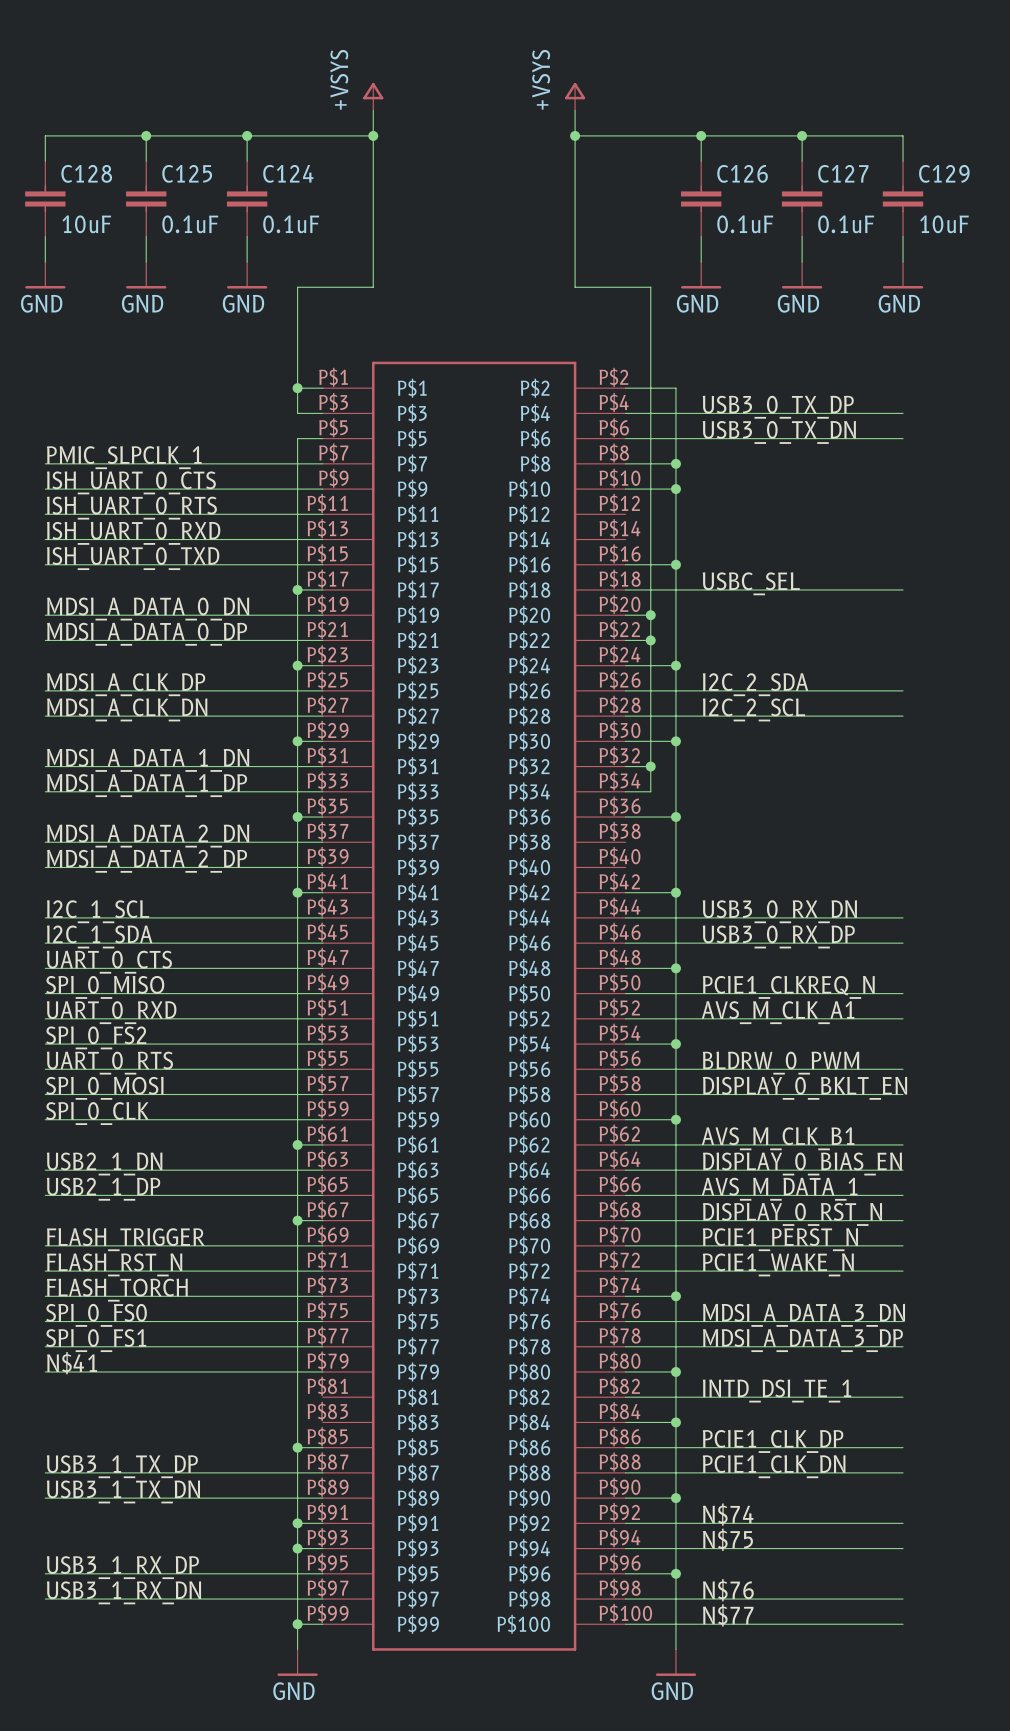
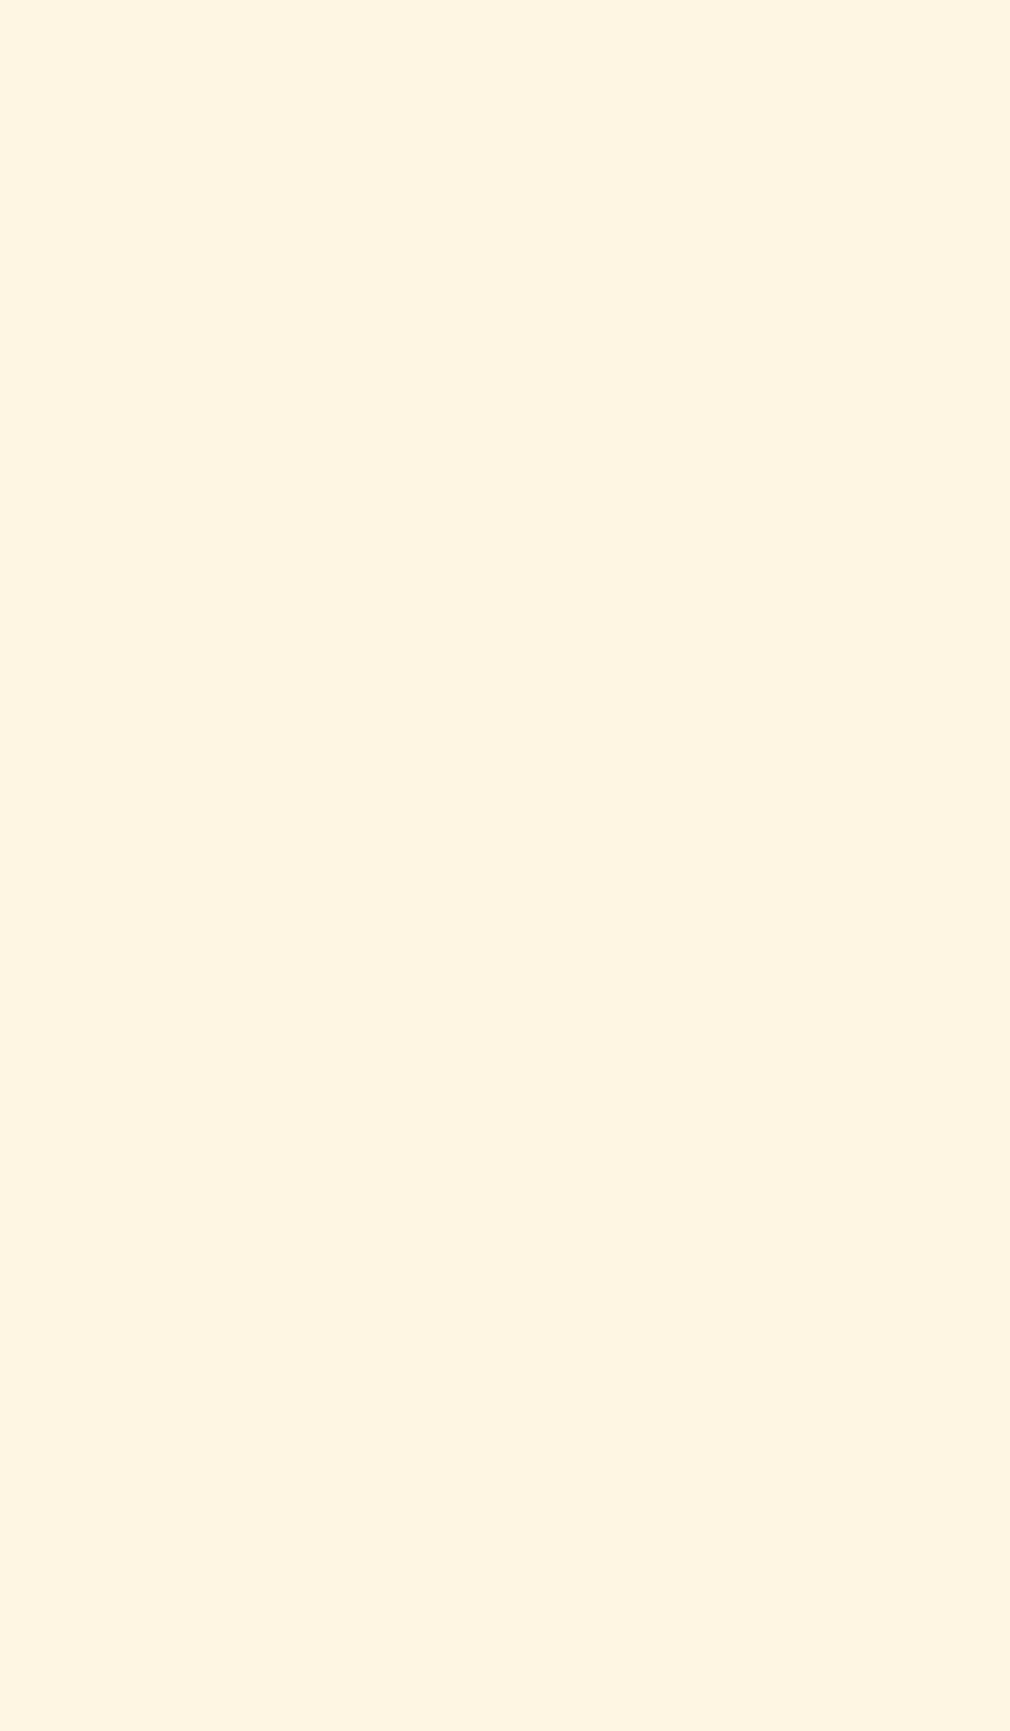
power symbol: +VSYS (373, 96) -> none
power symbol: +VSYS (575, 96) -> none
wire: (373, 110) (373, 287) (297, 287) (297, 413) (322, 413) -> none
wire: (575, 110) (575, 287) (650, 287) (650, 791) (625, 791) -> none
wire: (146, 135) (146, 161) -> none
junction: (146, 135) -> none
wire: (247, 135) (247, 161) -> none
junction: (247, 135) -> none
wire: (373, 135) (45, 135) (45, 161) -> none
junction: (373, 135) -> none
wire: (575, 135) (903, 135) (903, 161) -> none
junction: (575, 135) -> none
wire: (701, 135) (701, 161) -> none
junction: (701, 135) -> none
wire: (802, 135) (802, 161) -> none
junction: (802, 135) -> none
C128: 10uF (45, 198) -> none
C125: 0.1uF (146, 198) -> none
C124: 0.1uF (247, 198) -> none
C126: 0.1uF (701, 198) -> none
C127: 0.1uF (802, 198) -> none
C129: 10uF (903, 198) -> none
wire: (45, 236) (45, 262) -> none
wire: (146, 236) (146, 262) -> none
wire: (247, 236) (247, 262) -> none
wire: (701, 236) (701, 262) -> none
wire: (802, 236) (802, 262) -> none
wire: (903, 236) (903, 262) -> none
power symbol: GND (45, 275) -> none
power symbol: GND (146, 275) -> none
power symbol: GND (247, 275) -> none
power symbol: GND (701, 275) -> none
power symbol: GND (802, 275) -> none
power symbol: GND (903, 275) -> none
wire: (297, 388) (322, 388) -> none
junction: (297, 388) -> none
wire: (625, 388) (675, 388) (675, 1649) -> none
label: USB3_0_TX_DP (778, 407) -> none
wire: (625, 413) (903, 413) -> none
label: USB3_0_TX_DN (779, 432) -> none
wire: (322, 438) (297, 438) (297, 1649) -> none
wire: (625, 438) (903, 438) -> none
label: PMIC_SLPCLK_1 (124, 457) -> none
wire: (45, 463) (322, 463) -> none
wire: (625, 463) (675, 463) -> none
junction: (675, 463) -> none
label: ISH_UART_0_CTS (131, 482) -> none
wire: (45, 489) (322, 489) -> none
wire: (625, 489) (675, 489) -> none
junction: (675, 489) -> none
label: ISH_UART_0_RTS (131, 508) -> none
wire: (45, 514) (322, 514) -> none
label: ISH_UART_0_RXD (133, 533) -> none
wire: (45, 539) (322, 539) -> none
label: ISH_UART_0_TXD (133, 558) -> none
wire: (45, 564) (322, 564) -> none
wire: (625, 564) (675, 564) -> none
junction: (675, 564) -> none
label: USBC_SEL (751, 583) -> none
wire: (297, 589) (322, 589) -> none
junction: (297, 589) -> none
wire: (625, 589) (903, 589) -> none
label: MDSI_A_DATA_0_DN (148, 609) -> none
wire: (45, 615) (322, 615) -> none
wire: (625, 615) (650, 615) -> none
junction: (650, 615) -> none
label: MDSI_A_DATA_0_DP (147, 634) -> none
wire: (45, 640) (322, 640) -> none
wire: (625, 640) (650, 640) -> none
junction: (650, 640) -> none
wire: (297, 665) (322, 665) -> none
junction: (297, 665) -> none
wire: (625, 665) (675, 665) -> none
junction: (675, 665) -> none
label: MDSI_A_CLK_DP (126, 684) -> none
label: I2C_2_SDA (755, 684) -> none
wire: (45, 690) (322, 690) -> none
wire: (625, 690) (903, 690) -> none
label: MDSI_A_CLK_DN (127, 709) -> none
label: I2C_2_SCL (754, 709) -> none
wire: (45, 716) (322, 716) -> none
wire: (625, 716) (903, 716) -> none
wire: (297, 741) (322, 741) -> none
junction: (297, 741) -> none
wire: (625, 741) (675, 741) -> none
junction: (675, 741) -> none
label: MDSI_A_DATA_1_DN (148, 760) -> none
wire: (45, 766) (322, 766) -> none
wire: (625, 766) (650, 766) -> none
junction: (650, 766) -> none
label: MDSI_A_DATA_1_DP (147, 785) -> none
wire: (45, 791) (322, 791) -> none
wire: (297, 817) (322, 817) -> none
junction: (297, 817) -> none
wire: (625, 817) (675, 817) -> none
junction: (675, 817) -> none
label: MDSI_A_DATA_2_DN (148, 836) -> none
wire: (45, 842) (322, 842) -> none
label: MDSI_A_DATA_2_DP (147, 861) -> none
wire: (45, 867) (322, 867) -> none
wire: (297, 892) (322, 892) -> none
junction: (297, 892) -> none
wire: (625, 892) (675, 892) -> none
junction: (675, 892) -> none
label: I2C_1_SCL (98, 911) -> none
label: USB3_0_RX_DN (779, 911) -> none
wire: (45, 917) (322, 917) -> none
wire: (625, 917) (903, 917) -> none
label: I2C_1_SDA (99, 936) -> none
label: USB3_0_RX_DP (778, 936) -> none
wire: (45, 943) (322, 943) -> none
wire: (625, 943) (903, 943) -> none
label: UART_0_CTS (109, 962) -> none
wire: (45, 968) (322, 968) -> none
wire: (625, 968) (675, 968) -> none
junction: (675, 968) -> none
label: SPI_0_MISO (105, 987) -> none
label: PCIE1_CLKREQ_N (788, 987) -> none
wire: (45, 993) (322, 993) -> none
wire: (625, 993) (903, 993) -> none
part: (474, 1006) -> none
label: UART_0_RXD (111, 1012) -> none
label: AVS_M_CLK_A1 (778, 1012) -> none
wire: (45, 1018) (322, 1018) -> none
wire: (625, 1018) (903, 1018) -> none
label: SPI_0_FS2 (96, 1037) -> none
wire: (45, 1044) (322, 1044) -> none
wire: (625, 1044) (675, 1044) -> none
junction: (675, 1044) -> none
label: UART_0_RTS (109, 1063) -> none
label: BLDRW_0_PWM (781, 1063) -> none
wire: (45, 1069) (322, 1069) -> none
wire: (625, 1069) (903, 1069) -> none
label: SPI_0_MOSI (104, 1088) -> none
label: DISPLAY_0_BKLT_EN (805, 1088) -> none
wire: (45, 1094) (322, 1094) -> none
wire: (625, 1094) (903, 1094) -> none
label: SPI_0_CLK (97, 1113) -> none
wire: (45, 1119) (322, 1119) -> none
wire: (625, 1119) (675, 1119) -> none
junction: (675, 1119) -> none
label: AVS_M_CLK_B1 (778, 1138) -> none
wire: (297, 1144) (322, 1144) -> none
junction: (297, 1144) -> none
wire: (625, 1144) (903, 1144) -> none
label: USB2_1_DN (104, 1163) -> none
label: DISPLAY_0_BIAS_EN (802, 1163) -> none
wire: (45, 1170) (322, 1170) -> none
wire: (625, 1170) (903, 1170) -> none
label: USB2_1_DP (103, 1189) -> none
label: AVS_M_DATA_1 (779, 1189) -> none
wire: (45, 1195) (322, 1195) -> none
wire: (625, 1195) (903, 1195) -> none
label: DISPLAY_0_RST_N (792, 1214) -> none
wire: (297, 1220) (322, 1220) -> none
junction: (297, 1220) -> none
wire: (625, 1220) (903, 1220) -> none
label: FLASH_TRIGGER (125, 1239) -> none
label: PCIE1_PERST_N (780, 1239) -> none
wire: (45, 1245) (322, 1245) -> none
wire: (625, 1245) (903, 1245) -> none
label: FLASH_RST_N (114, 1264) -> none
label: PCIE1_WAKE_N (778, 1264) -> none
wire: (45, 1271) (322, 1271) -> none
wire: (625, 1271) (903, 1271) -> none
label: FLASH_TORCH (117, 1290) -> none
wire: (45, 1296) (322, 1296) -> none
wire: (625, 1296) (675, 1296) -> none
junction: (675, 1296) -> none
label: SPI_0_FS0 (96, 1315) -> none
label: MDSI_A_DATA_3_DN (804, 1315) -> none
wire: (45, 1321) (322, 1321) -> none
wire: (625, 1321) (903, 1321) -> none
label: SPI_0_FS1 (96, 1340) -> none
label: MDSI_A_DATA_3_DP (802, 1340) -> none
wire: (45, 1346) (322, 1346) -> none
wire: (625, 1346) (903, 1346) -> none
label: N$41 (72, 1363) -> none
wire: (45, 1371) (322, 1371) -> none
wire: (625, 1371) (675, 1371) -> none
junction: (675, 1371) -> none
label: INTD_DSI_TE_1 (777, 1391) -> none
wire: (625, 1397) (903, 1397) -> none
wire: (625, 1422) (675, 1422) -> none
junction: (675, 1422) -> none
label: PCIE1_CLK_DP (773, 1441) -> none
wire: (297, 1447) (322, 1447) -> none
junction: (297, 1447) -> none
wire: (625, 1447) (903, 1447) -> none
label: USB3_1_TX_DP (122, 1466) -> none
label: PCIE1_CLK_DN (774, 1466) -> none
wire: (45, 1472) (322, 1472) -> none
wire: (625, 1472) (903, 1472) -> none
label: USB3_1_TX_DN (123, 1491) -> none
wire: (45, 1498) (322, 1498) -> none
wire: (625, 1498) (675, 1498) -> none
junction: (675, 1498) -> none
label: N$74 (728, 1514) -> none
wire: (297, 1523) (322, 1523) -> none
junction: (297, 1523) -> none
wire: (625, 1523) (903, 1523) -> none
label: N$75 (727, 1539) -> none
wire: (297, 1548) (322, 1548) -> none
junction: (297, 1548) -> none
wire: (625, 1548) (903, 1548) -> none
label: USB3_1_RX_DP (122, 1567) -> none
wire: (45, 1573) (322, 1573) -> none
wire: (625, 1573) (675, 1573) -> none
junction: (675, 1573) -> none
label: N$76 (728, 1590) -> none
label: USB3_1_RX_DN (123, 1592) -> none
wire: (45, 1599) (322, 1599) -> none
wire: (625, 1599) (903, 1599) -> none
label: N$77 (728, 1615) -> none
wire: (297, 1624) (322, 1624) -> none
junction: (297, 1624) -> none
wire: (625, 1624) (903, 1624) -> none
power symbol: GND (297, 1662) -> none
power symbol: GND (675, 1662) -> none

